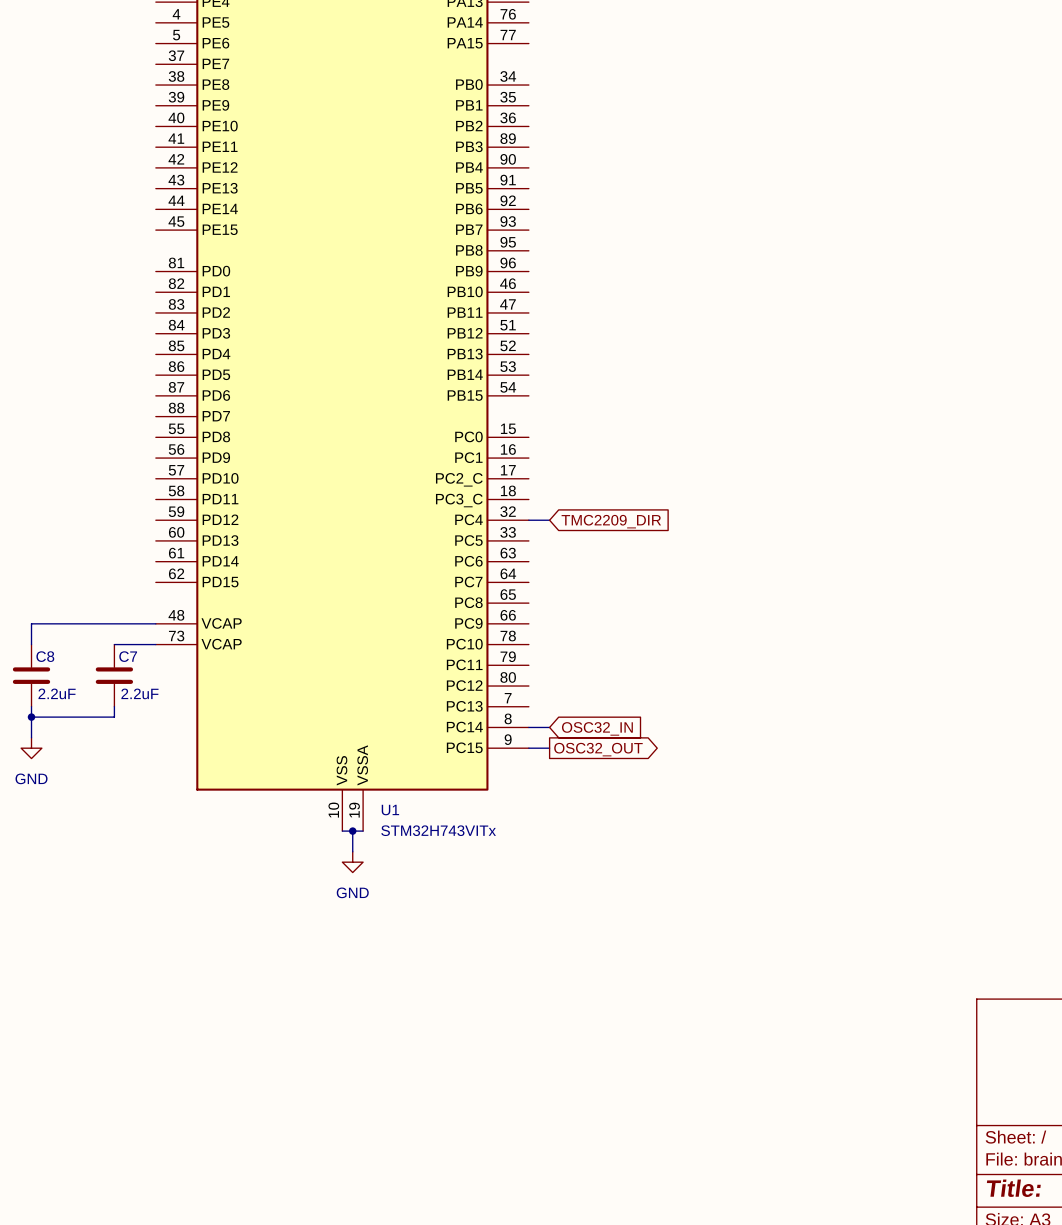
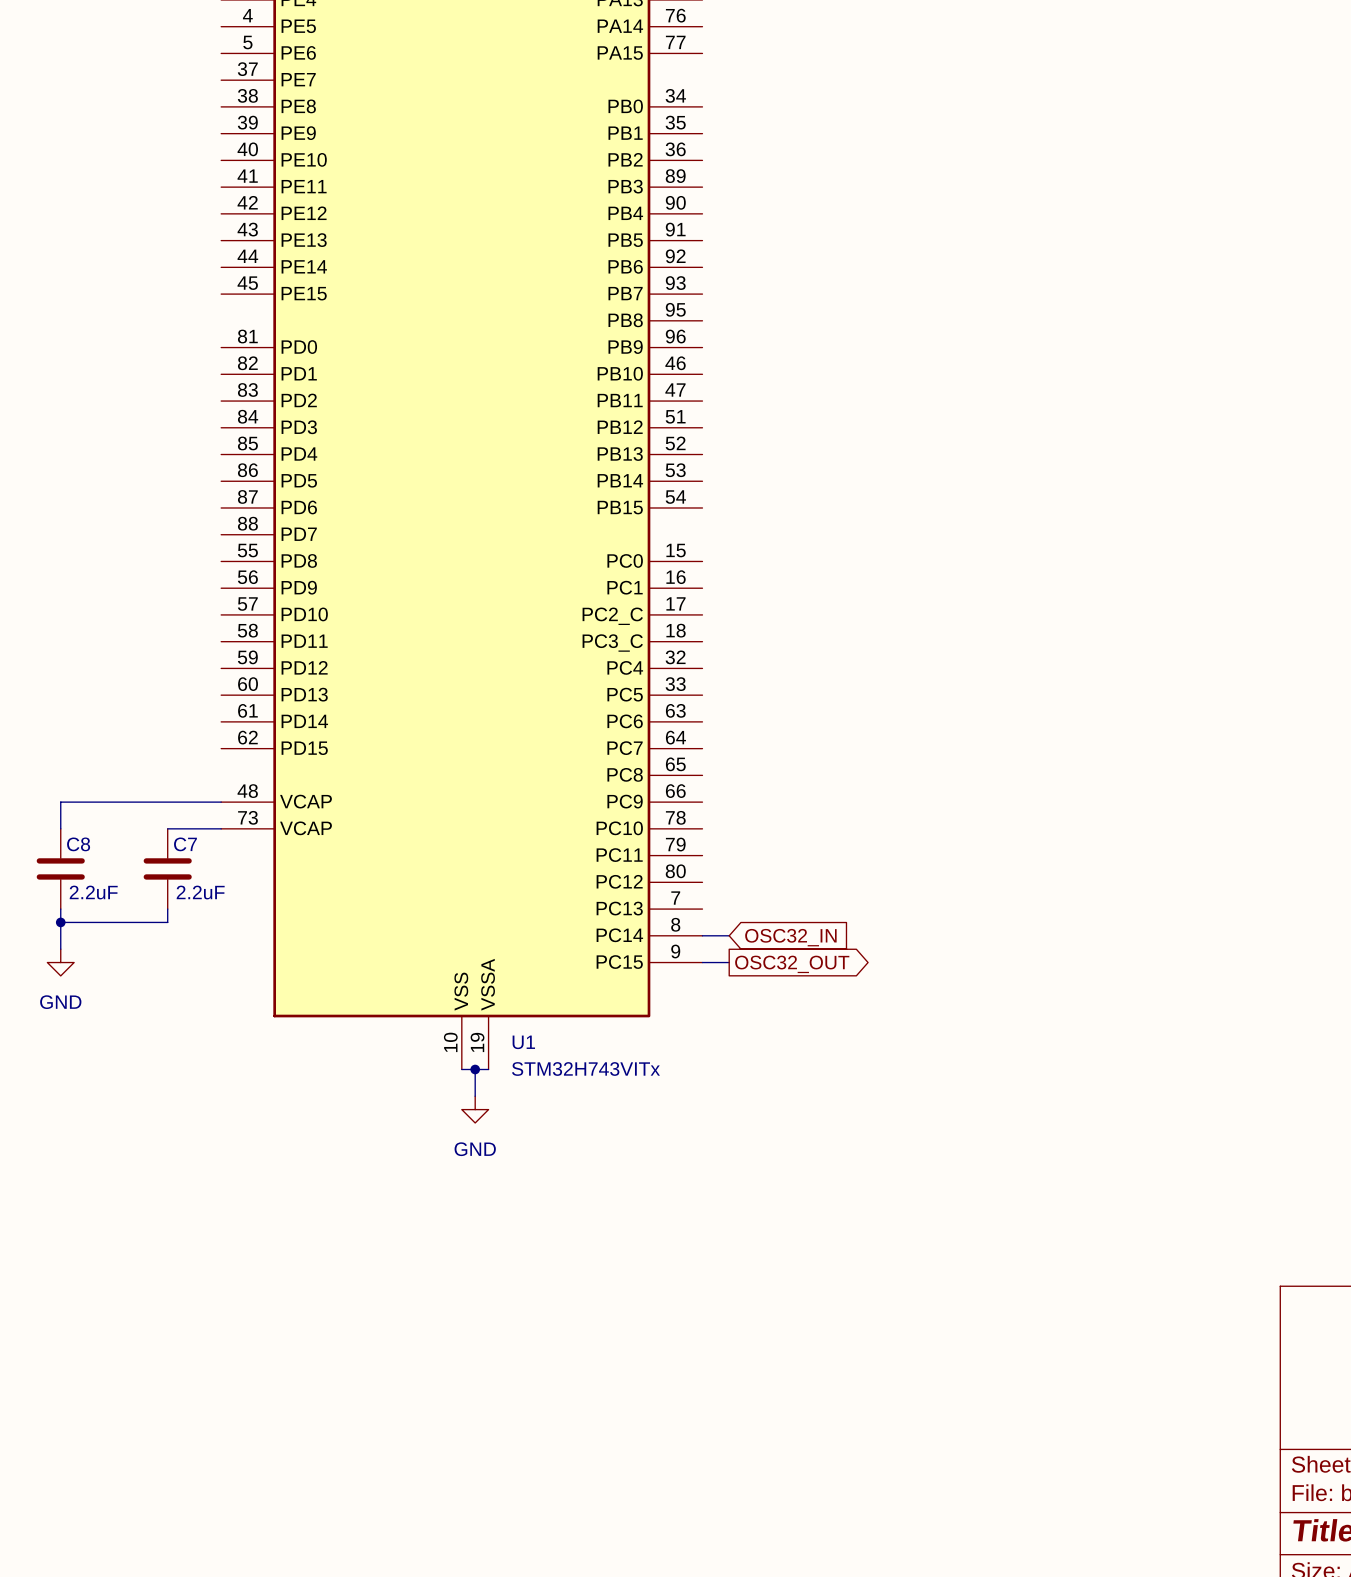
wire: (528, 520) (549, 520) -> none
global label: TMC2209_DIR (611, 521) -> none

